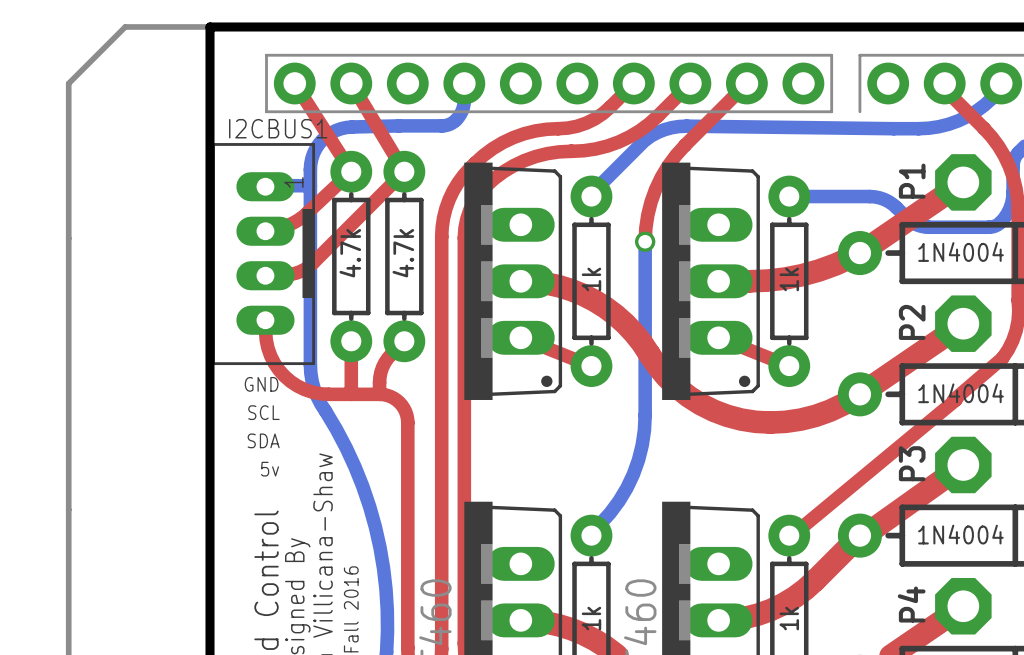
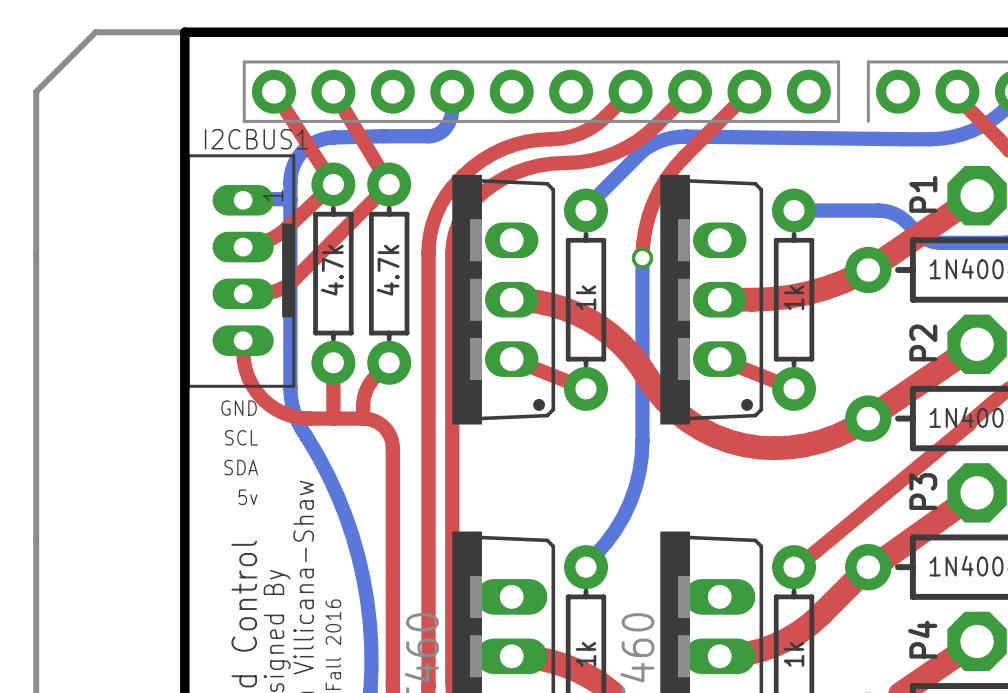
part footprint: [464, 162, 563, 400] -> [452, 174, 556, 425]
part footprint: [662, 162, 760, 400] -> [660, 174, 764, 425]

